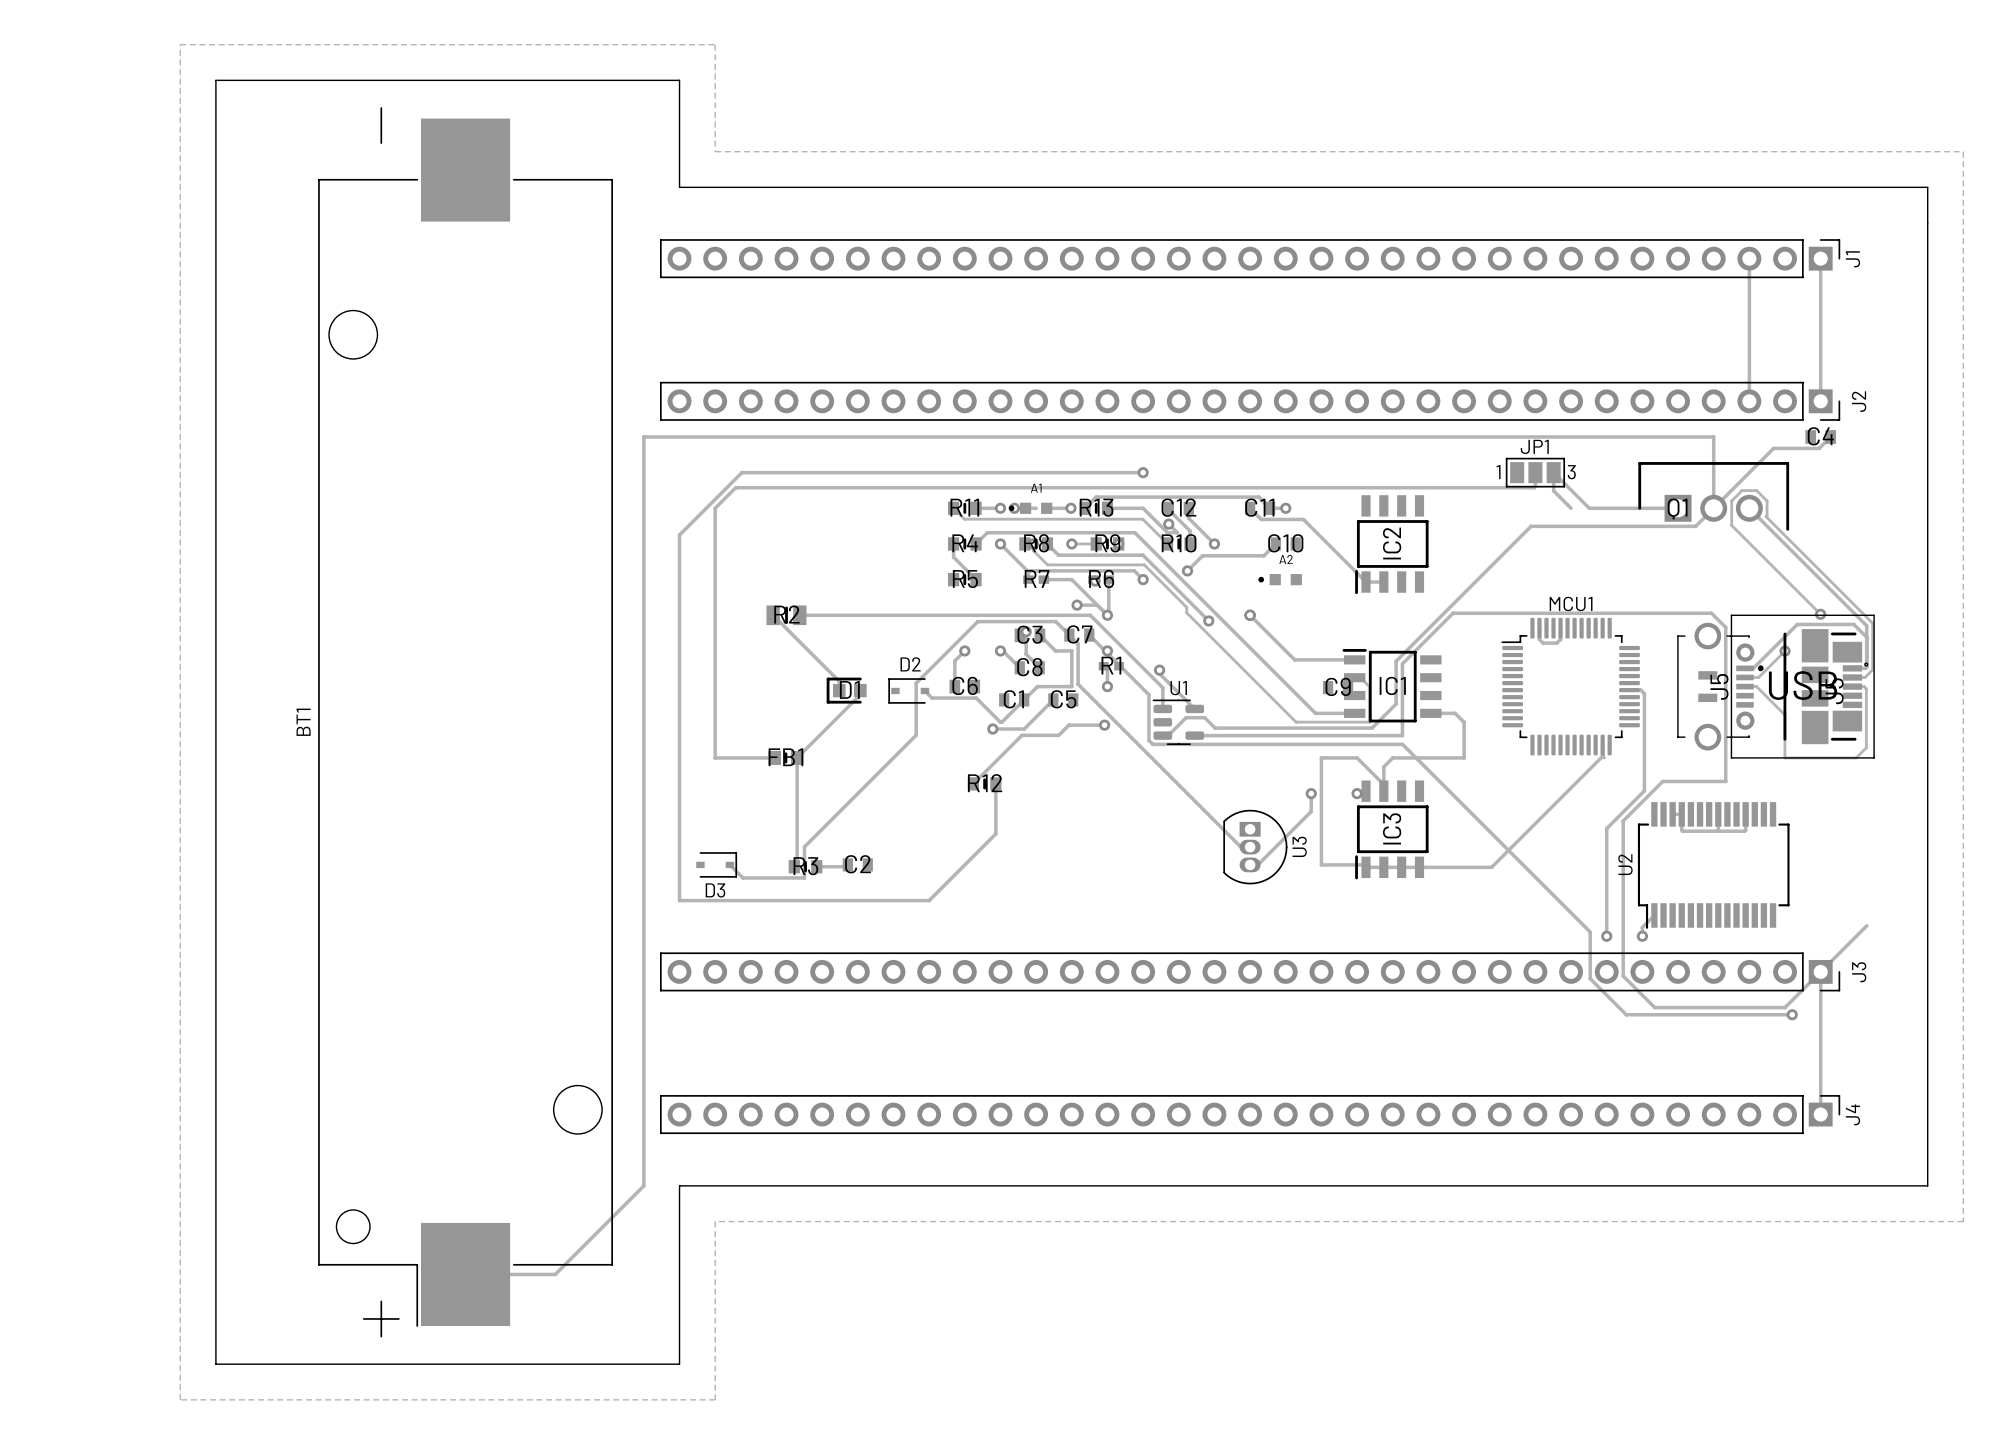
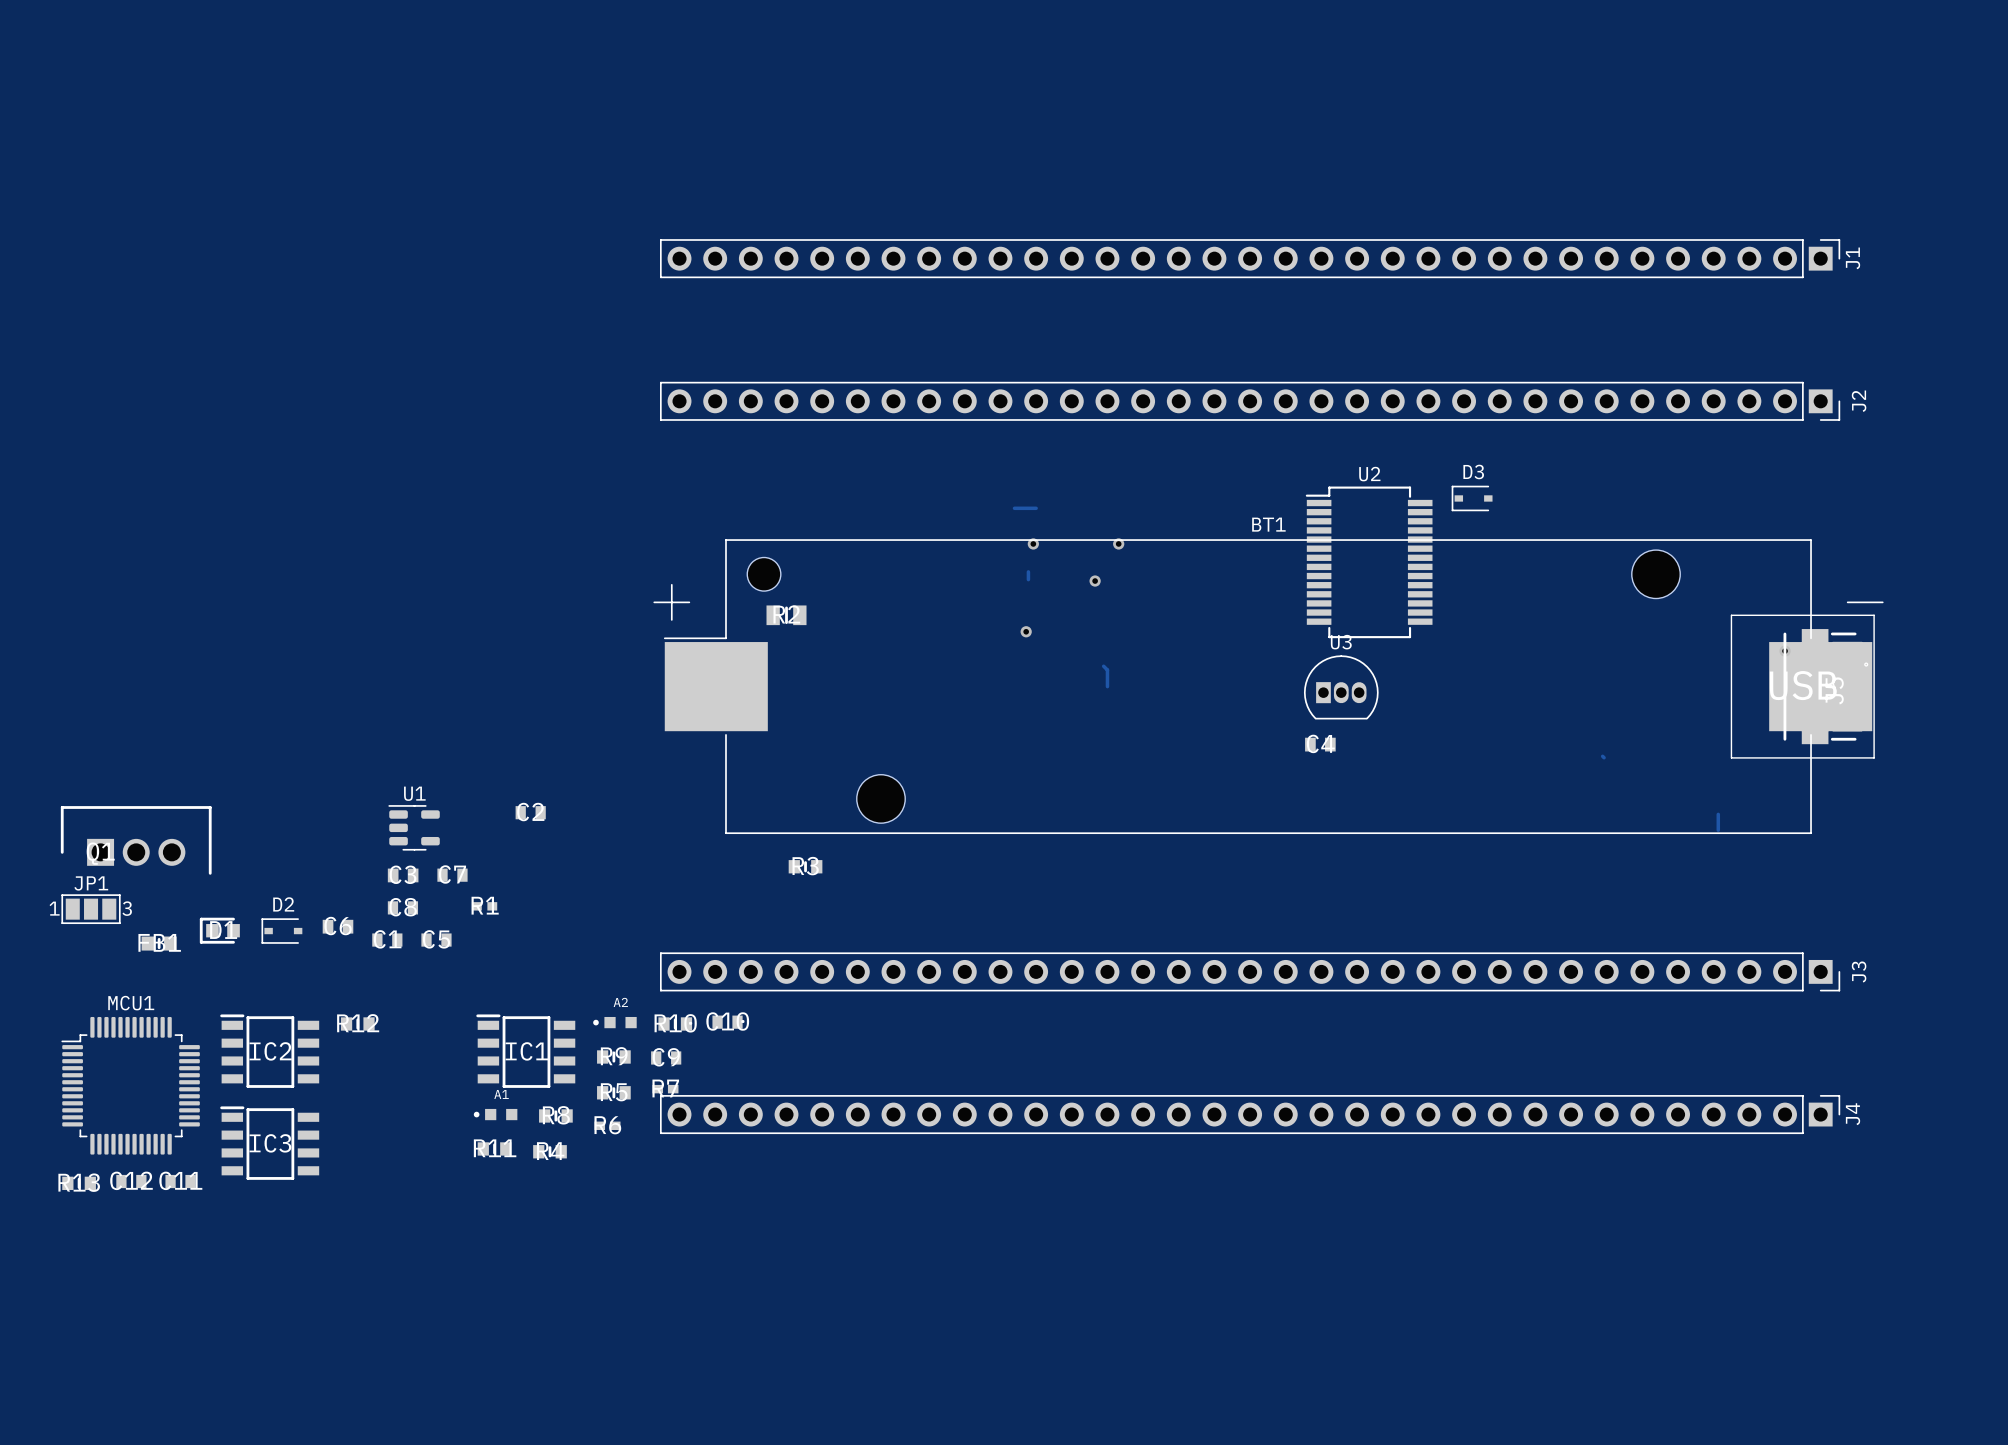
zone outline: (180, 44) (180, 1399) (715, 1399) (715, 1221) (1963, 1221) (1963, 151) (715, 151) (715, 44) (180, 44) -> none
board edge: (215, 80) (679, 80) (679, 187) (1927, 187) (1927, 1185) (679, 1185) (679, 1364) (215, 1364) (215, 80) -> none
track: (1749, 258) (1749, 401) -> none
track: (1820, 258) (1820, 401) -> none
C4 position: (1820, 436) -> (1320, 744)
track: (1830, 436) (1819, 448) (1773, 448) (1695, 526) (1531, 526) (1396, 661) (1396, 704) (1372, 728) (1215, 728) (1204, 717) (1186, 717) (1168, 735) (1162, 735) -> none
track: (1143, 472) (741, 472) (679, 535) (679, 900) (929, 900) (995, 833) (995, 783) -> none
via: (1143, 472) -> none
track: (1535, 472) (1534, 487) (735, 487) (715, 508) (715, 757) (774, 757) -> none
JP1 position: (1535, 472) -> (91, 909)
Q1 position: (1713, 496) -> (136, 840)
track: (953, 508) (964, 519) (1142, 519) (1167, 543) -> none
R11 position: (964, 508) -> (494, 1148)
track: (976, 508) (1000, 508) -> none
via: (1000, 508) -> none
via: (1014, 508) -> none
A1 position: (1030, 508) -> (495, 1114)
track: (1046, 508) (1070, 508) -> none
via: (1070, 508) -> none
track: (1085, 508) (1096, 497) (1258, 497) (1270, 508) (1285, 508) -> none
R13 position: (1096, 508) -> (79, 1183)
track: (1107, 508) (1143, 508) (1167, 532) (1177, 532) (1168, 524) -> none
track: (1168, 508) (1190, 530) (1190, 543) -> none
C12 position: (1178, 508) -> (131, 1181)
track: (1188, 508) (1188, 518) (1214, 543) -> none
track: (1250, 508) (1261, 519) (1303, 519) (1366, 582) (1383, 582) -> none
C11 position: (1260, 508) -> (180, 1181)
via: (1285, 508) -> none
track: (1571, 508) (1553, 490) (1553, 472) (1589, 508) (1678, 508) -> none
track: (1713, 508) (1713, 436) (643, 436) (643, 1185) (555, 1274) (465, 1274) -> none
track: (1749, 508) (1866, 625) (1866, 667) (1852, 668) -> none
track: (1765, 516) (1872, 623) (1872, 669) (1864, 677) (1852, 677) -> none
track: (1766, 516) (1767, 500) (1756, 490) (1742, 490) (1731, 500) (1731, 525) -> none
via: (1168, 524) -> none
track: (1731, 525) (1820, 614) -> none
track: (953, 543) (953, 557) (976, 579) -> none
R4 position: (964, 543) -> (550, 1151)
track: (976, 543) (987, 532) (1134, 532) (1315, 713) (1354, 713) -> none
track: (1000, 543) (1028, 571) (1134, 570) (1143, 579) -> none
via: (1000, 543) -> none
track: (1024, 543) (1033, 543) (1033, 550) (1047, 564) (1144, 564) (1186, 607) (1186, 612) (1296, 722) (1369, 722) (1369, 686) (1359, 676) (1354, 676) -> none
R8 position: (1036, 543) -> (555, 1115)
track: (1047, 543) (1058, 555) (1143, 555) (1208, 620) -> none
track: (1071, 543) (1096, 543) -> none
via: (1071, 543) -> none
R9 position: (1107, 543) -> (613, 1056)
R10 position: (1178, 543) -> (675, 1023)
via: (1214, 543) -> none
track: (1275, 543) (1263, 555) (1202, 555) (1187, 570) -> none
C10 position: (1285, 543) -> (727, 1022)
IC2 rotation: 0° (1391, 544) -> 90° clockwise (269, 1051)
IC2 position: (1391, 544) -> (269, 1051)
via: (1187, 570) -> none
R5 position: (964, 579) -> (613, 1092)
R7 position: (1036, 579) -> (665, 1089)
track: (1043, 579) (1071, 579) (1107, 615) (1108, 579) -> none
R6 position: (1101, 579) -> (607, 1125)
via: (1143, 579) -> none
A2 position: (1280, 579) -> (614, 1022)
track: (1077, 605) (1097, 605) -> none
via: (1077, 605) -> none
via: (1820, 614) -> none
track: (773, 615) (839, 681) (839, 690) -> none
track: (799, 615) (1090, 615) (1162, 687) (1162, 708) -> none
via: (1107, 615) -> none
track: (1250, 615) (1294, 659) (1354, 659) -> none
via: (1250, 615) -> none
via: (1208, 620) -> none
track: (1539, 628) (1539, 639) (1543, 643) (1556, 643) (1560, 639) (1560, 628) -> none
track: (1026, 631) (1026, 654) (1039, 667) -> none
C3 position: (1029, 635) -> (403, 875)
track: (1039, 635) (1055, 650) (1071, 650) (1071, 686) (1037, 686) (1001, 722) (976, 698) (932, 698) (924, 690) -> none
C7 position: (1079, 635) -> (452, 875)
track: (1089, 635) (1148, 694) (1148, 740) (1152, 744) (1402, 744) (1590, 932) (1590, 978) (1626, 1014) (1792, 1014) -> none
track: (1866, 637) (1853, 624) (1797, 624) (1753, 668) (1744, 668) -> none
track: (964, 650) (954, 660) (954, 686) -> none
via: (964, 650) -> none
track: (1000, 650) (1002, 650) (1019, 667) -> none
via: (1000, 650) -> none
via: (1107, 650) -> none
track: (1785, 651) (1758, 677) (1744, 677) -> none
R1 position: (1111, 666) -> (484, 906)
C8 position: (1029, 667) -> (402, 907)
track: (1159, 670) (1159, 673) (1194, 708) -> none
via: (1159, 670) -> none
IC1 position: (1392, 685) -> (525, 1051)
C6 position: (964, 686) -> (337, 926)
via: (1107, 686) -> none
MCU1 position: (1570, 686) -> (130, 1085)
J5: (1720, 686) -> none
track: (1744, 686) (1756, 686) (1784, 714) (1784, 757) (1856, 757) (1866, 747) (1866, 688) (1864, 686) (1852, 686) -> none
C9 position: (1338, 687) -> (666, 1057)
D1 position: (846, 690) -> (219, 930)
track: (860, 690) (860, 694) (797, 757) (797, 863) (794, 866) -> none
D2 position: (908, 690) -> (281, 931)
track: (1629, 690) (1640, 690) (1644, 693) (1644, 790) (1606, 828) (1606, 936) -> none
C1 position: (1014, 699) -> (387, 940)
track: (1053, 699) (1024, 729) (992, 729) -> none
C5 position: (1063, 699) -> (436, 940)
track: (1430, 713) (1455, 713) (1464, 722) (1464, 757) (1392, 757) (1383, 766) (1383, 791) -> none
BT1 rotation: 0° (465, 722) -> 90° clockwise (1268, 686)
BT1 position: (465, 722) -> (1268, 686)
U1 position: (1178, 722) -> (414, 827)
track: (1104, 725) (1068, 725) (1058, 735) (1021, 735) (973, 783) -> none
via: (1104, 725) -> none
via: (992, 729) -> none
track: (1194, 735) (1402, 735) (1402, 663) (1453, 613) (1711, 613) (1725, 627) (1725, 781) (1662, 781) (1623, 820) (1623, 976) (1654, 1007) (1785, 1007) (1866, 925) -> none
track: (1602, 745) (1602, 756) (1491, 867) (1366, 867) (1363, 864) (1321, 864) (1321, 757) (1357, 757) (1383, 784) -> none
FB1 position: (785, 757) -> (159, 943)
R12 position: (984, 783) -> (357, 1023)
track: (1311, 793) (1311, 811) (1257, 864) (1250, 864) -> none
via: (1311, 793) -> none
via: (1357, 793) -> none
track: (1672, 814) (1681, 814) (1682, 831) (1744, 831) (1745, 814) -> none
IC3 rotation: 0° (1391, 829) -> 90° clockwise (269, 1143)
IC3 position: (1391, 829) -> (269, 1143)
track: (1250, 847) (1240, 847) (1078, 684) (1078, 643) (1055, 621) (977, 621) (916, 683) (916, 735) (804, 846) (804, 877) (742, 877) (729, 864) -> none
U3 rotation: 0° (1255, 847) -> 90° counterclockwise (1341, 687)
U3 position: (1255, 847) -> (1341, 687)
D3 rotation: 0° (716, 864) -> 180° (1472, 498)
D3 position: (716, 864) -> (1472, 498)
track: (847, 864) (846, 866) (816, 866) -> none
C2 position: (857, 864) -> (530, 812)
U2 rotation: 0° (1713, 865) -> 90° clockwise (1369, 562)
U2 position: (1713, 865) -> (1369, 562)
track: (1654, 915) (1642, 927) (1642, 936) -> none
via: (1606, 936) -> none
via: (1642, 936) -> none
track: (1820, 971) (1820, 1114) -> none
via: (1792, 1014) -> none

